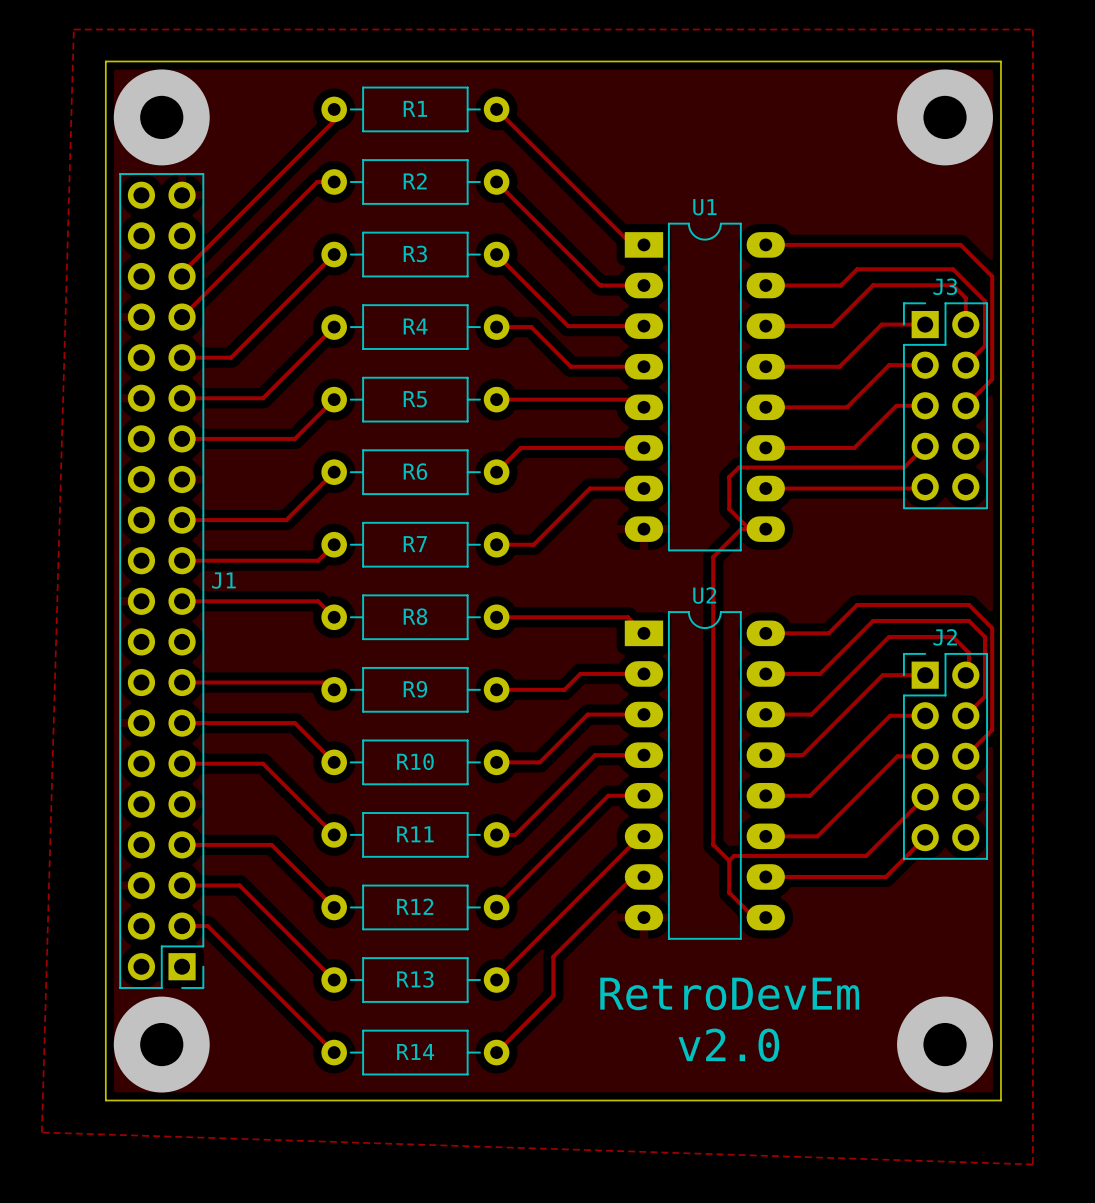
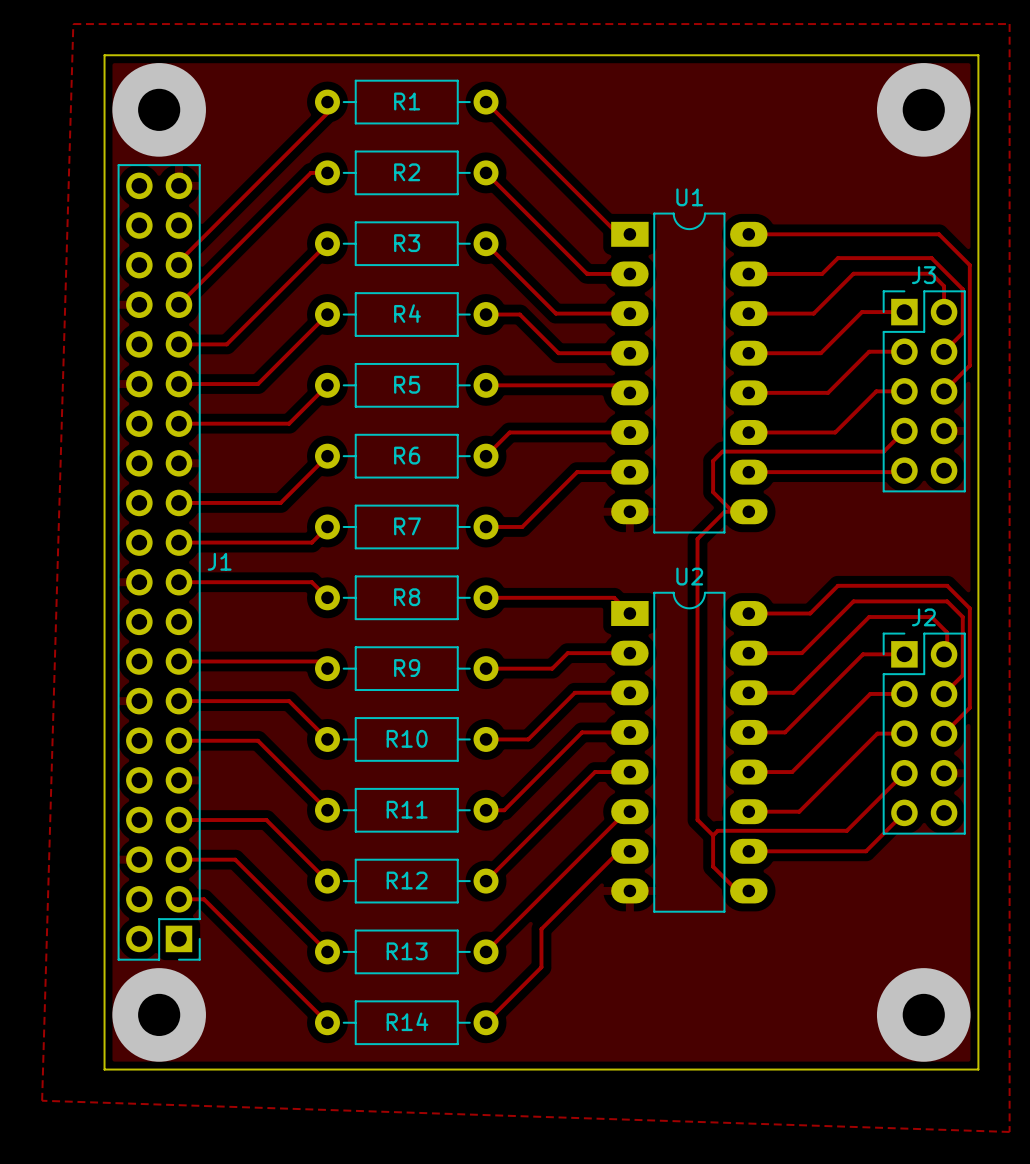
text: RetroDevEm (729, 993) -> none
text: v2.0 (728, 1045) -> none

